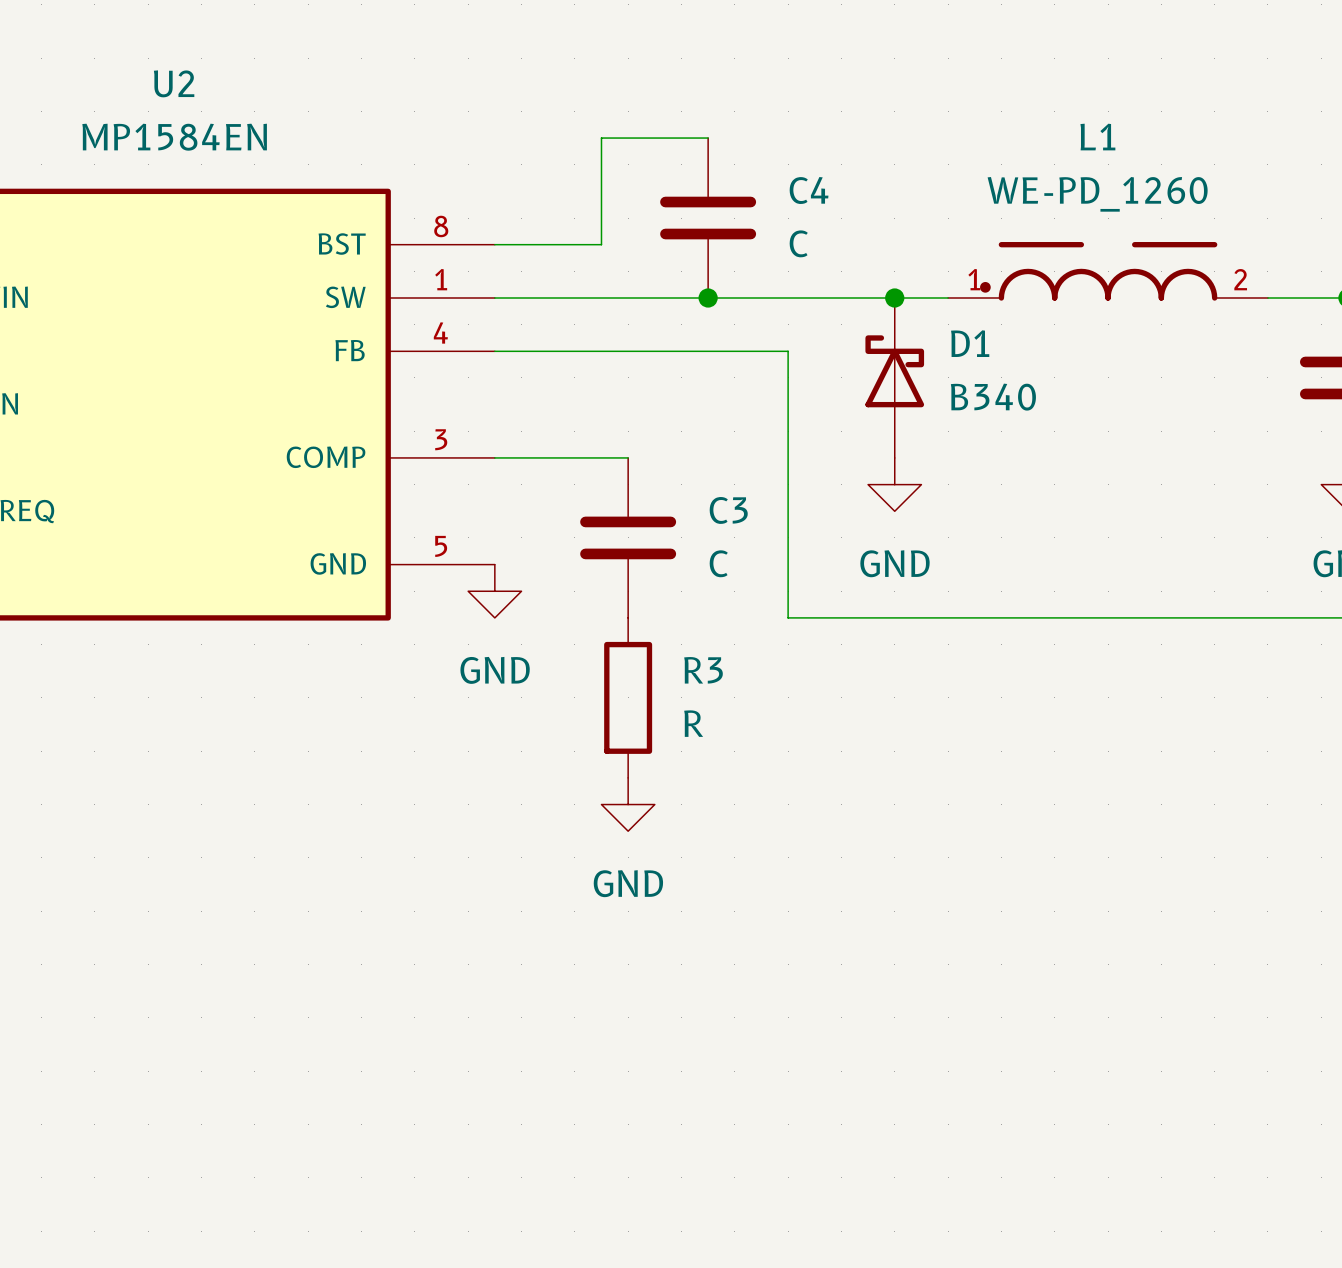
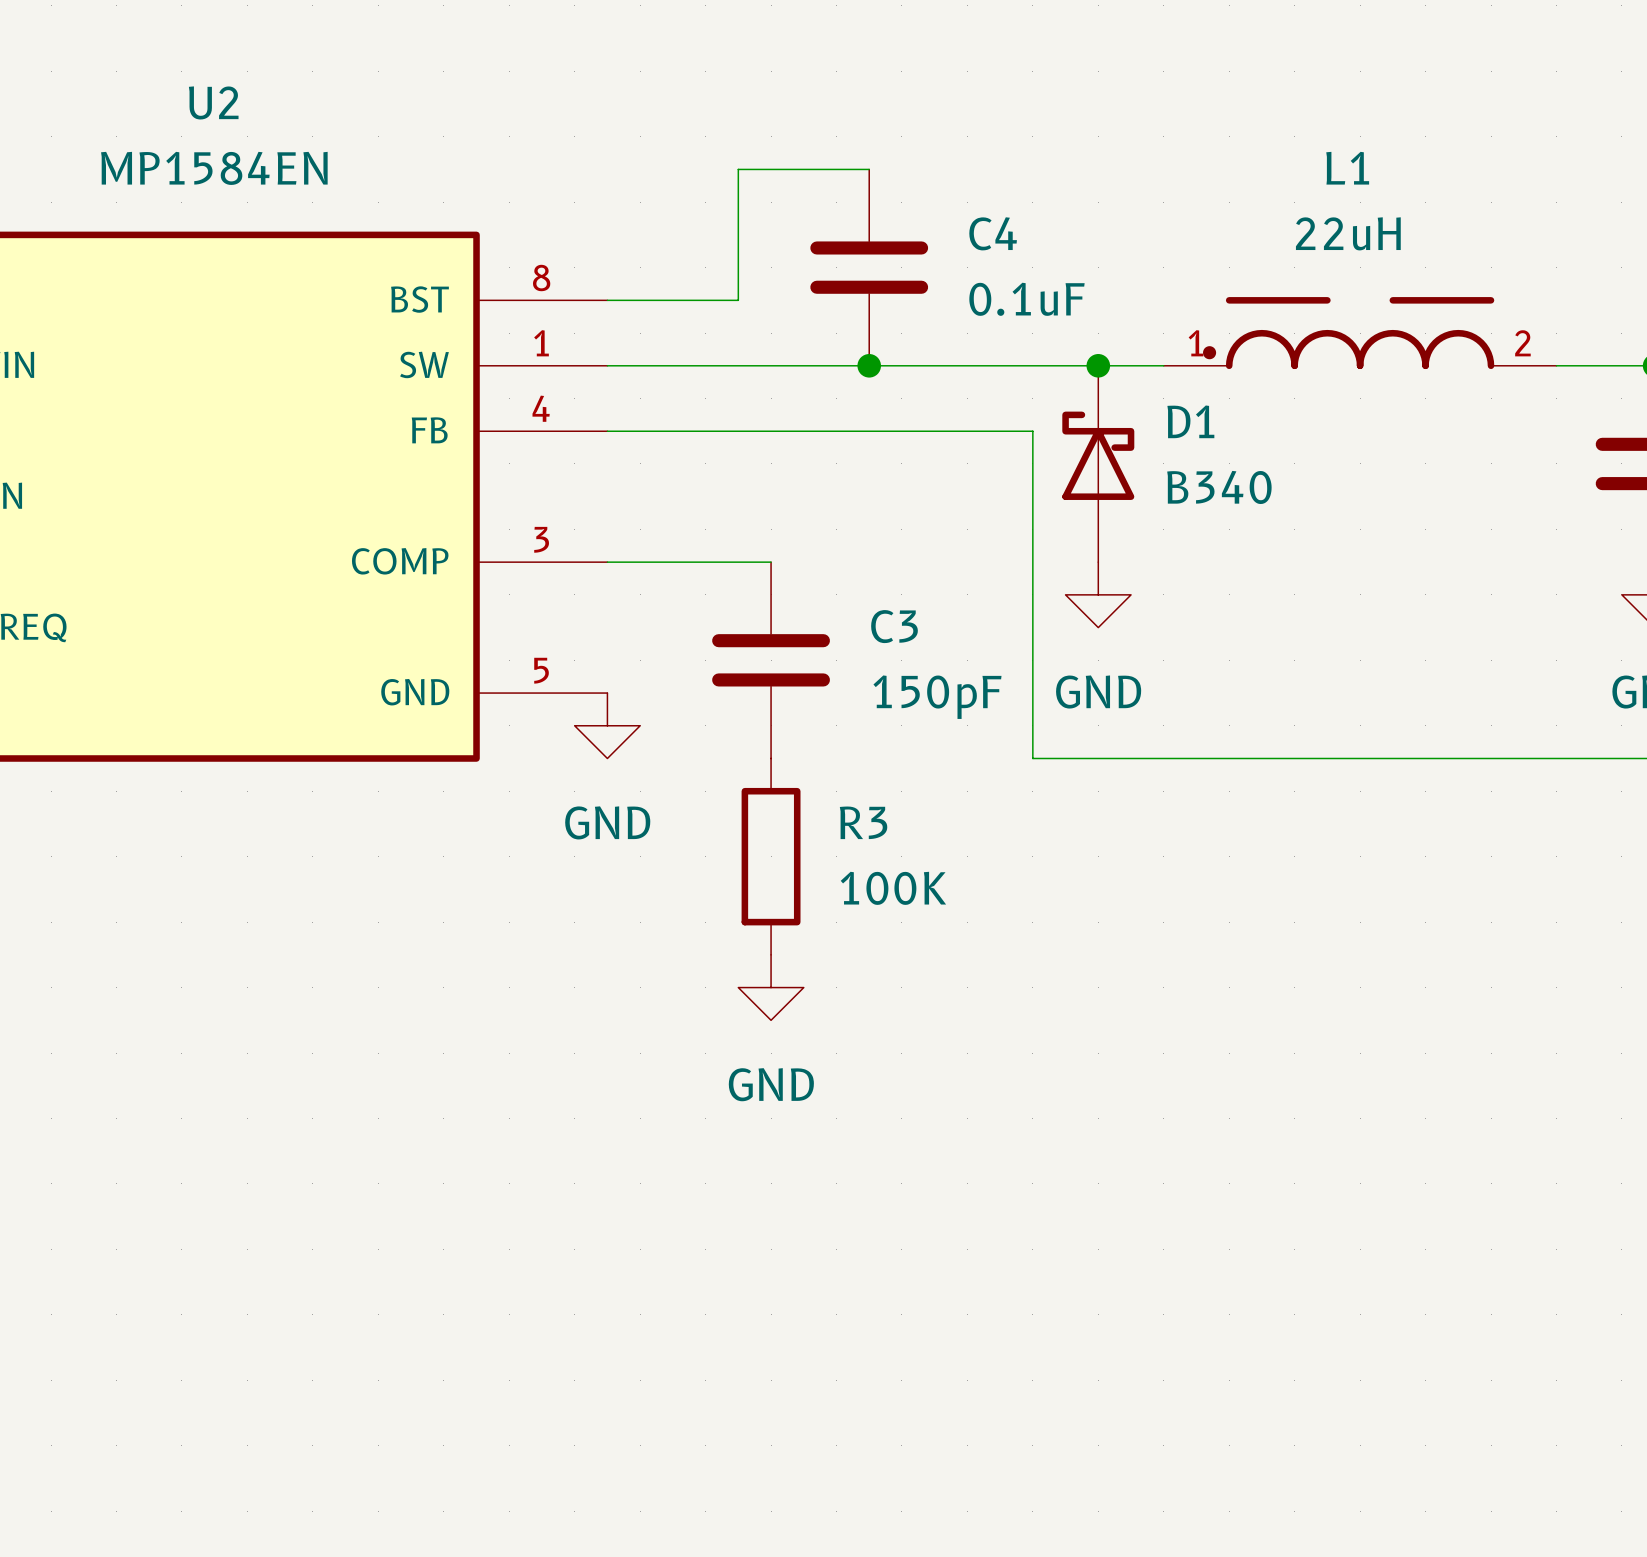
L1 value: WE-PD_1260 (1097, 194) -> 22uH (1348, 233)
C4 value: C (798, 243) -> 0.1uF (1026, 299)
wire: (788, 351) (788, 617) (841, 617) -> (967, 431) (1032, 431) (1032, 758)
C3 value: C (718, 563) -> 150pF (937, 697)
R3 value: R (693, 723) -> 100K (893, 888)

